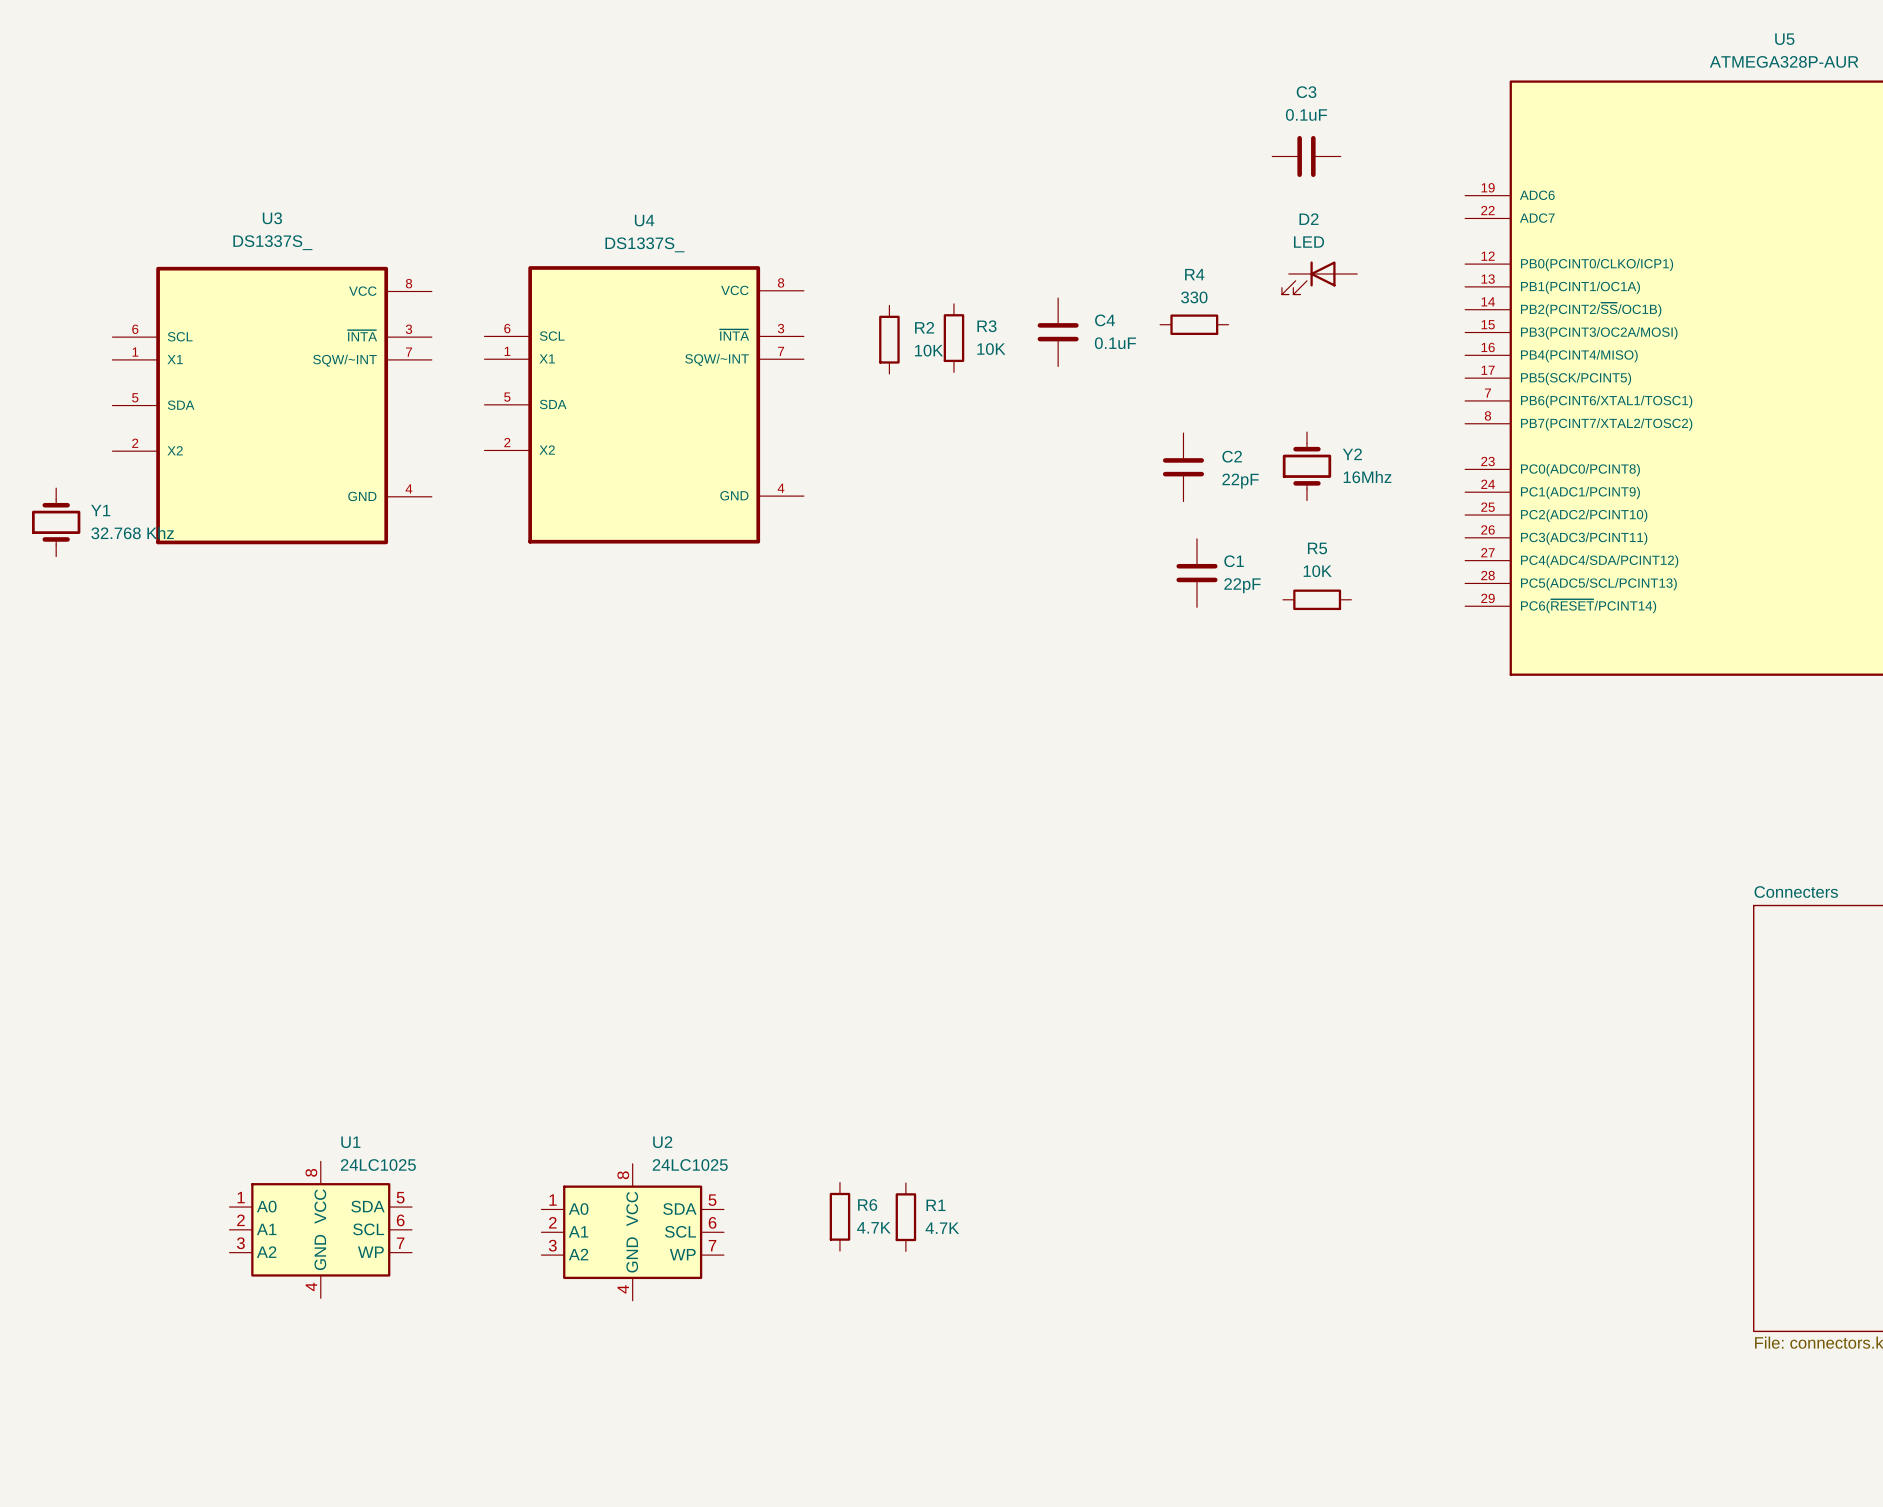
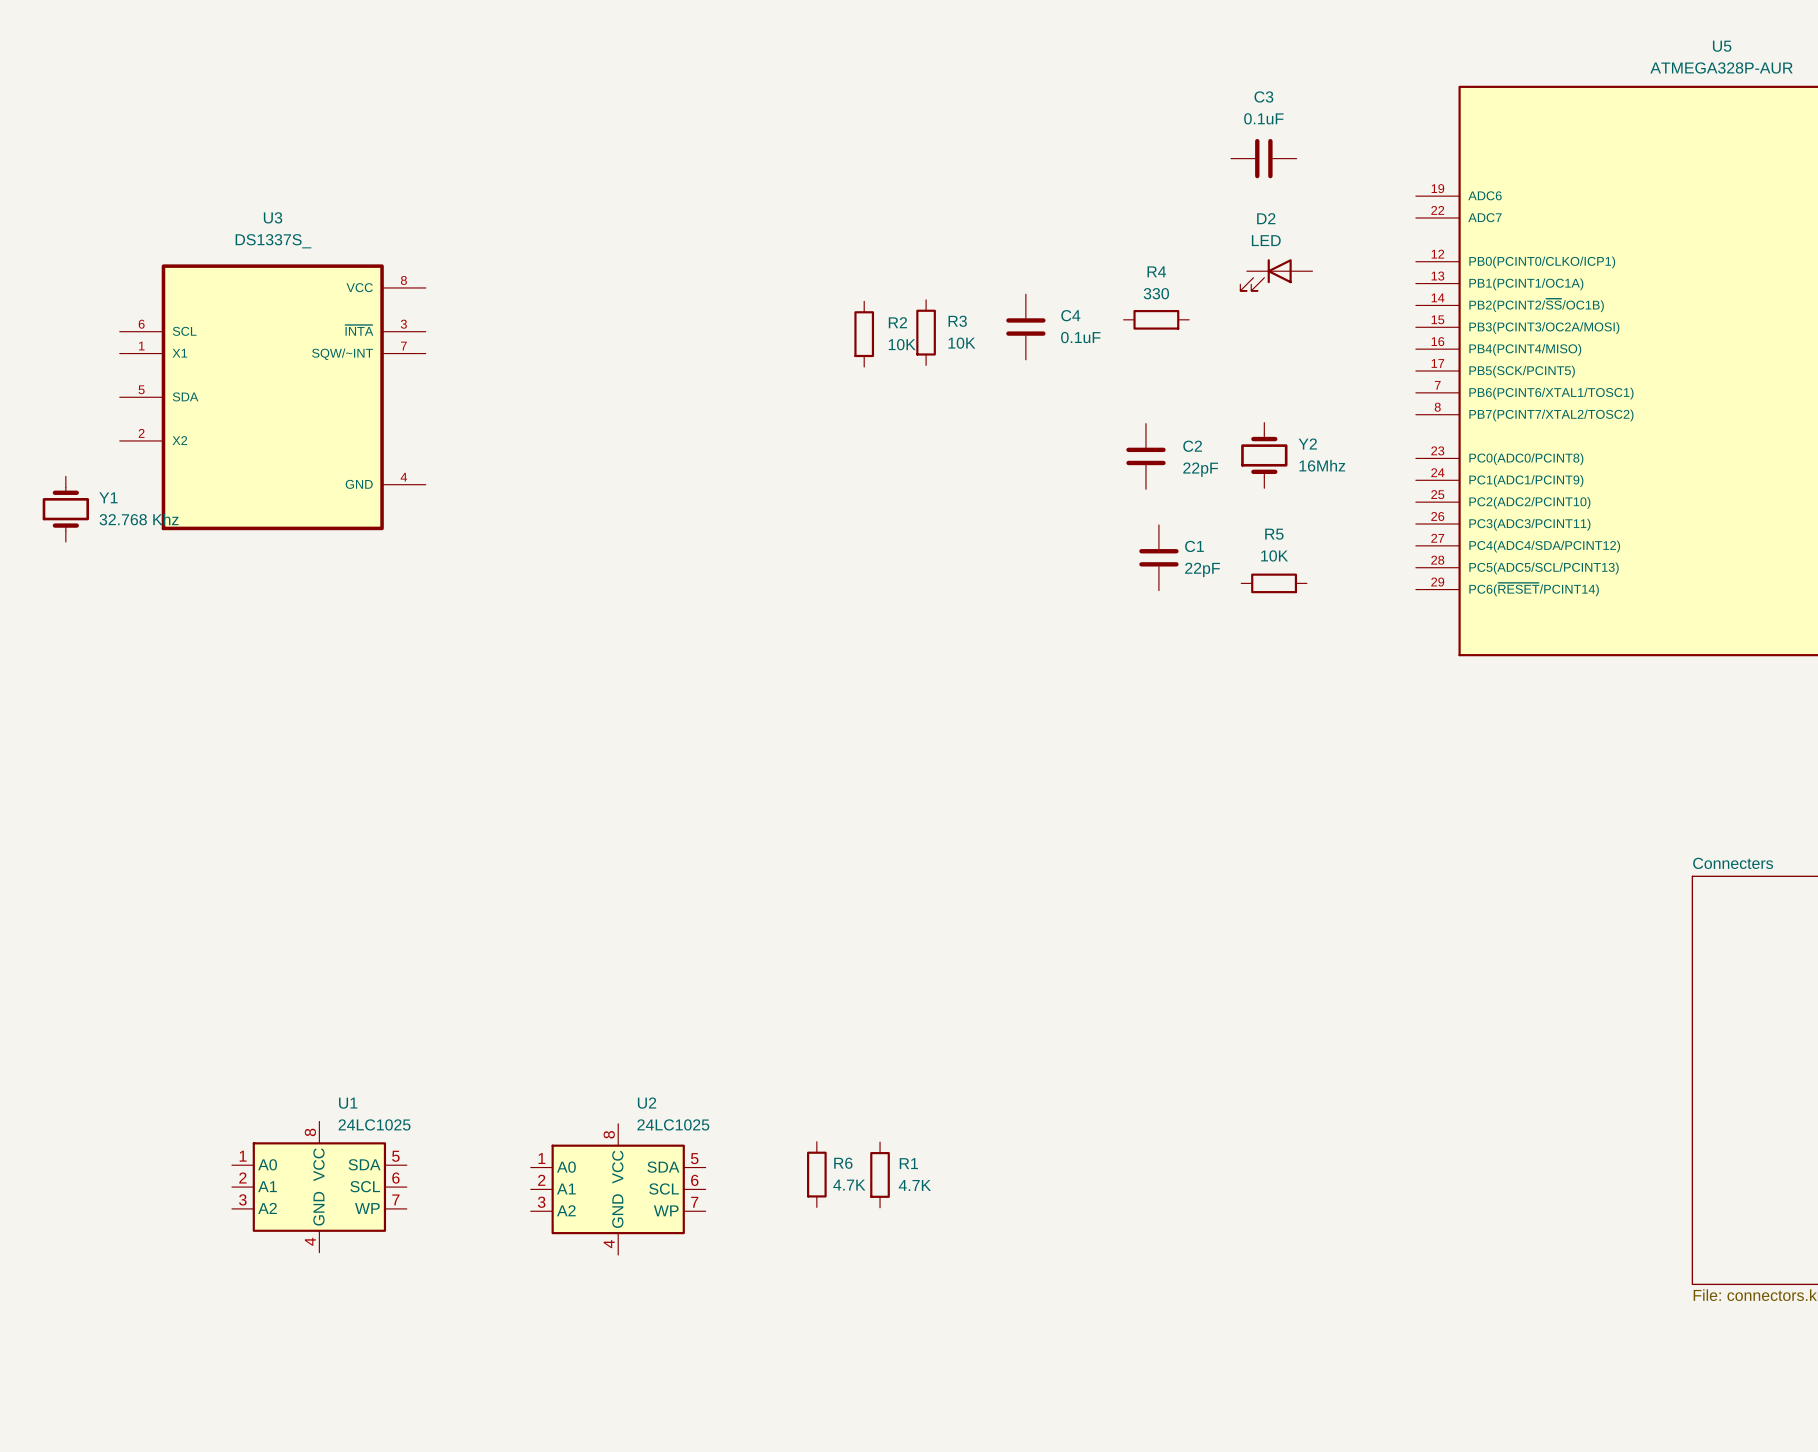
U4: DS1337S_ (644, 404) -> none

